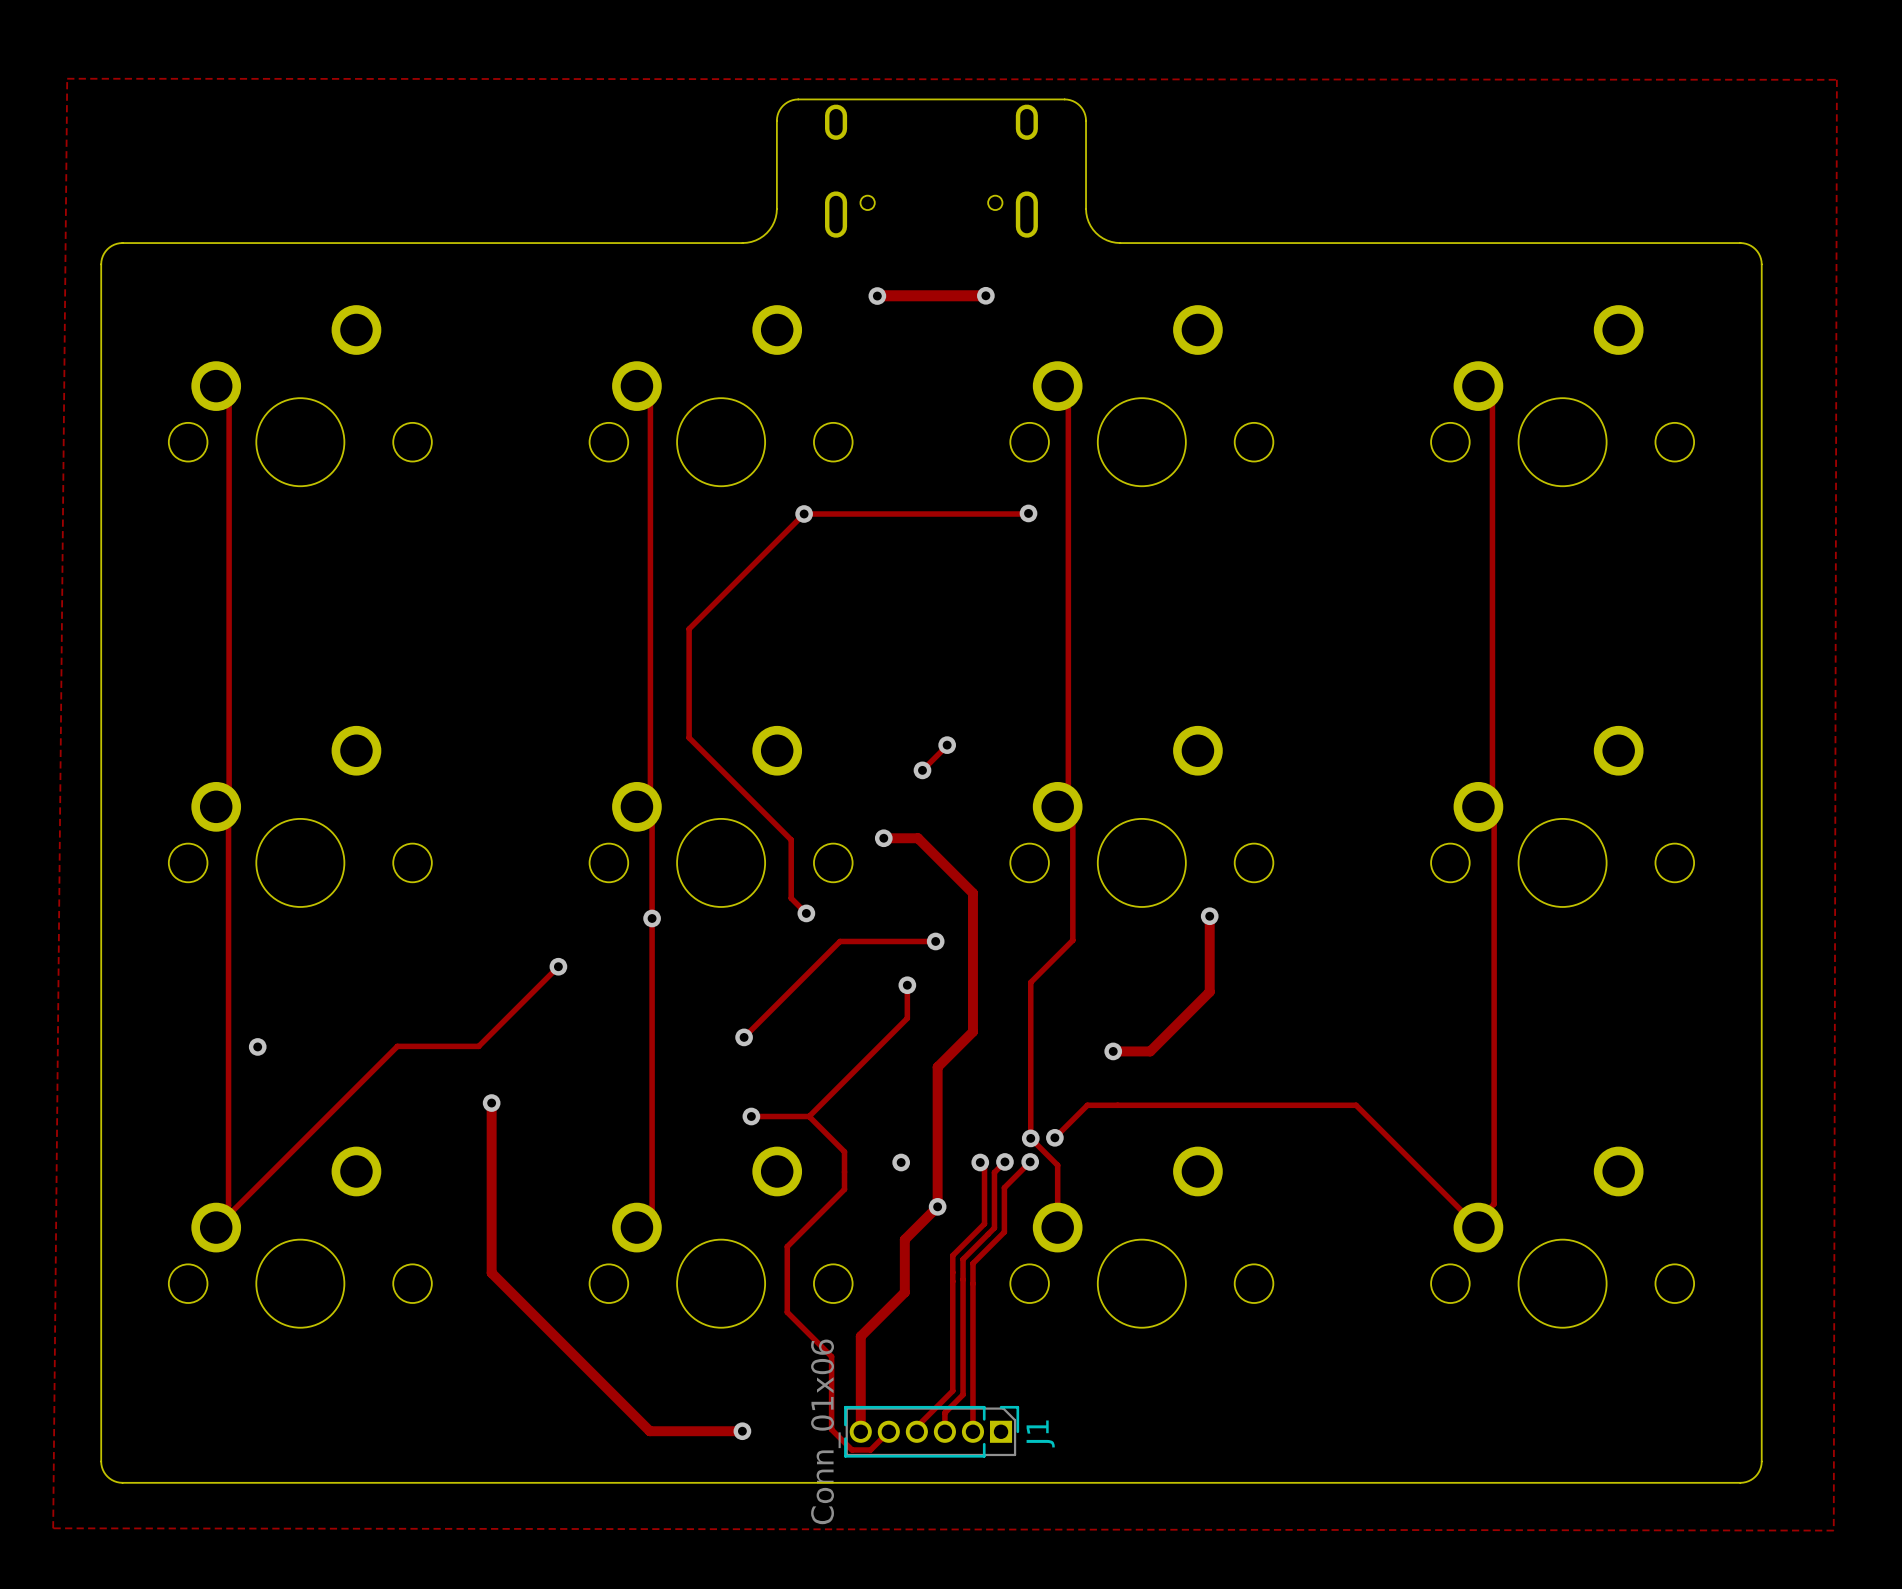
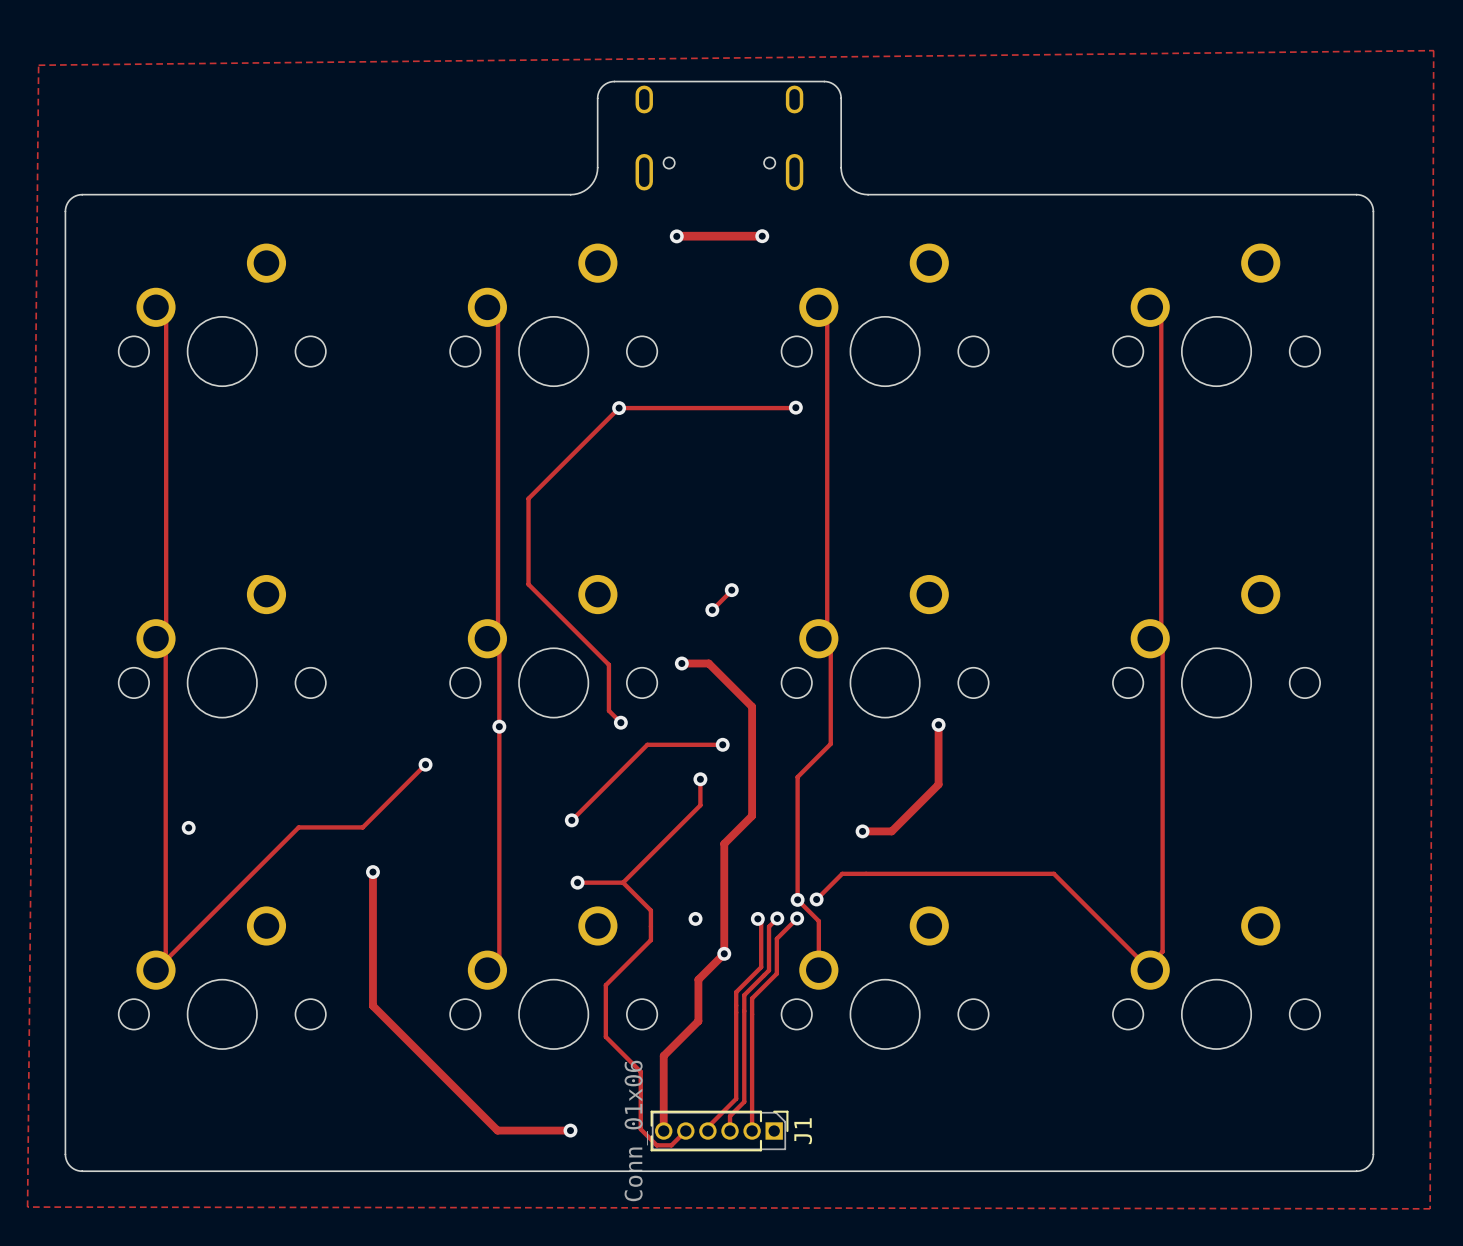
zone outline: (67, 78) (1836, 79) (1833, 1530) -> (38, 65) (1433, 50) (1430, 1208)

